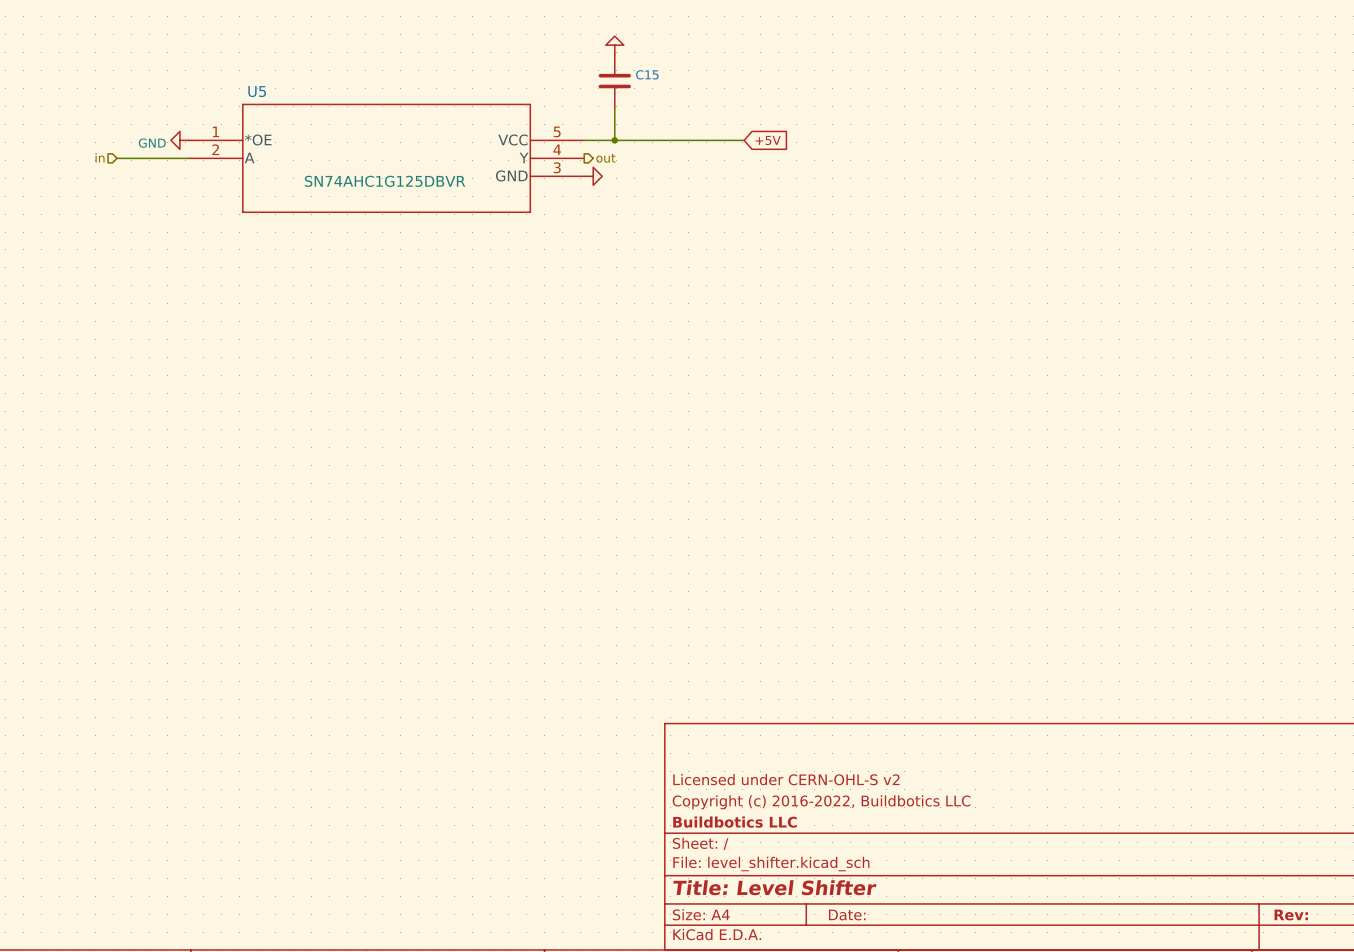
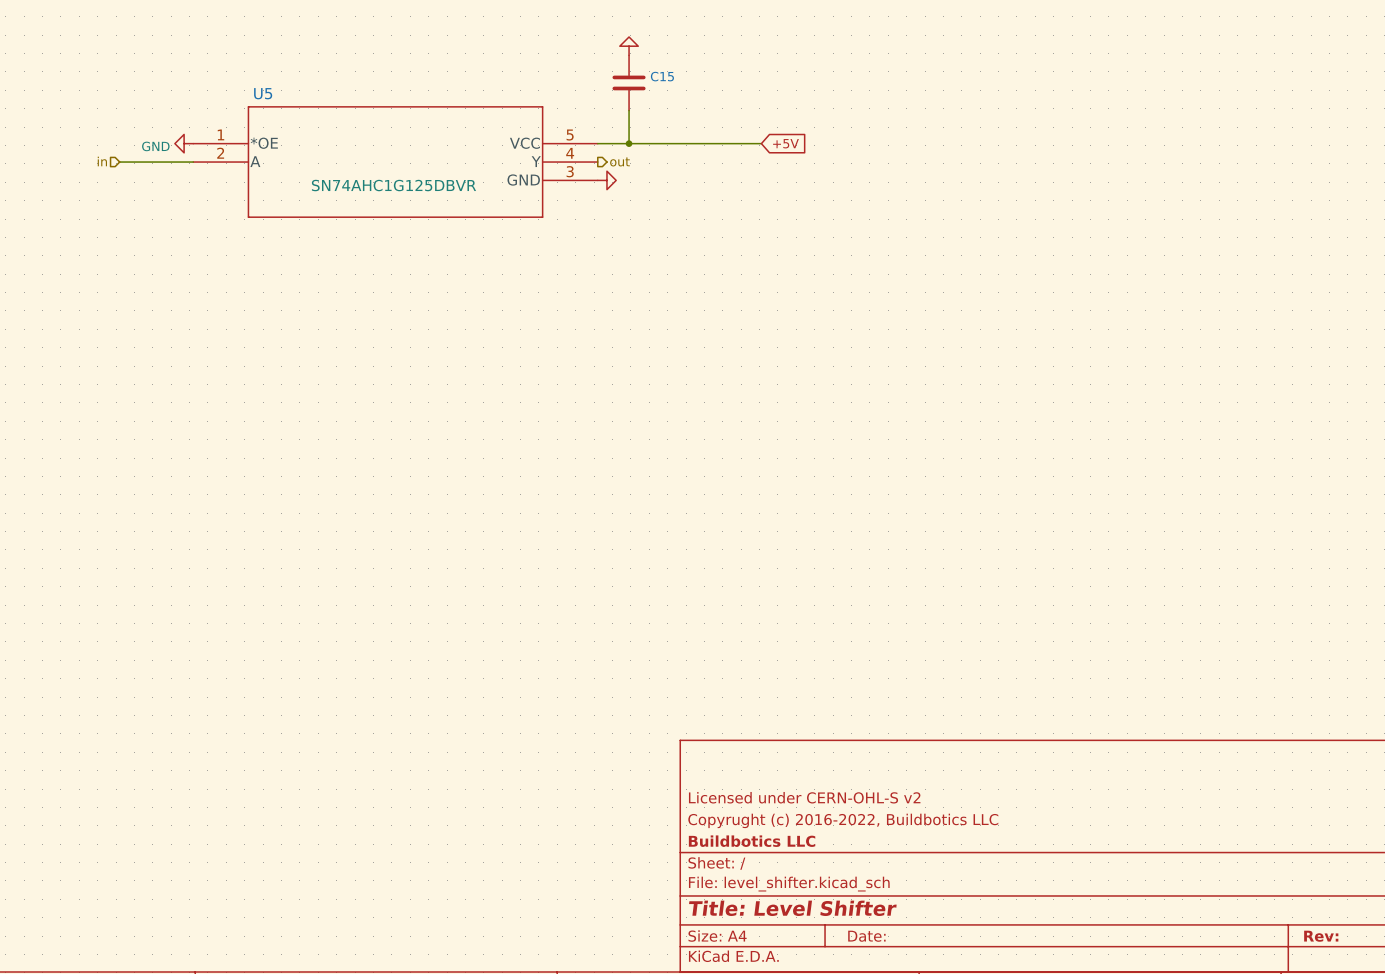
title block: Copyright (c) 2016-2022, Buildbotics LLC (821, 802) -> Copyrught (c) 2016-2022, Buildbotics LLC (843, 820)

